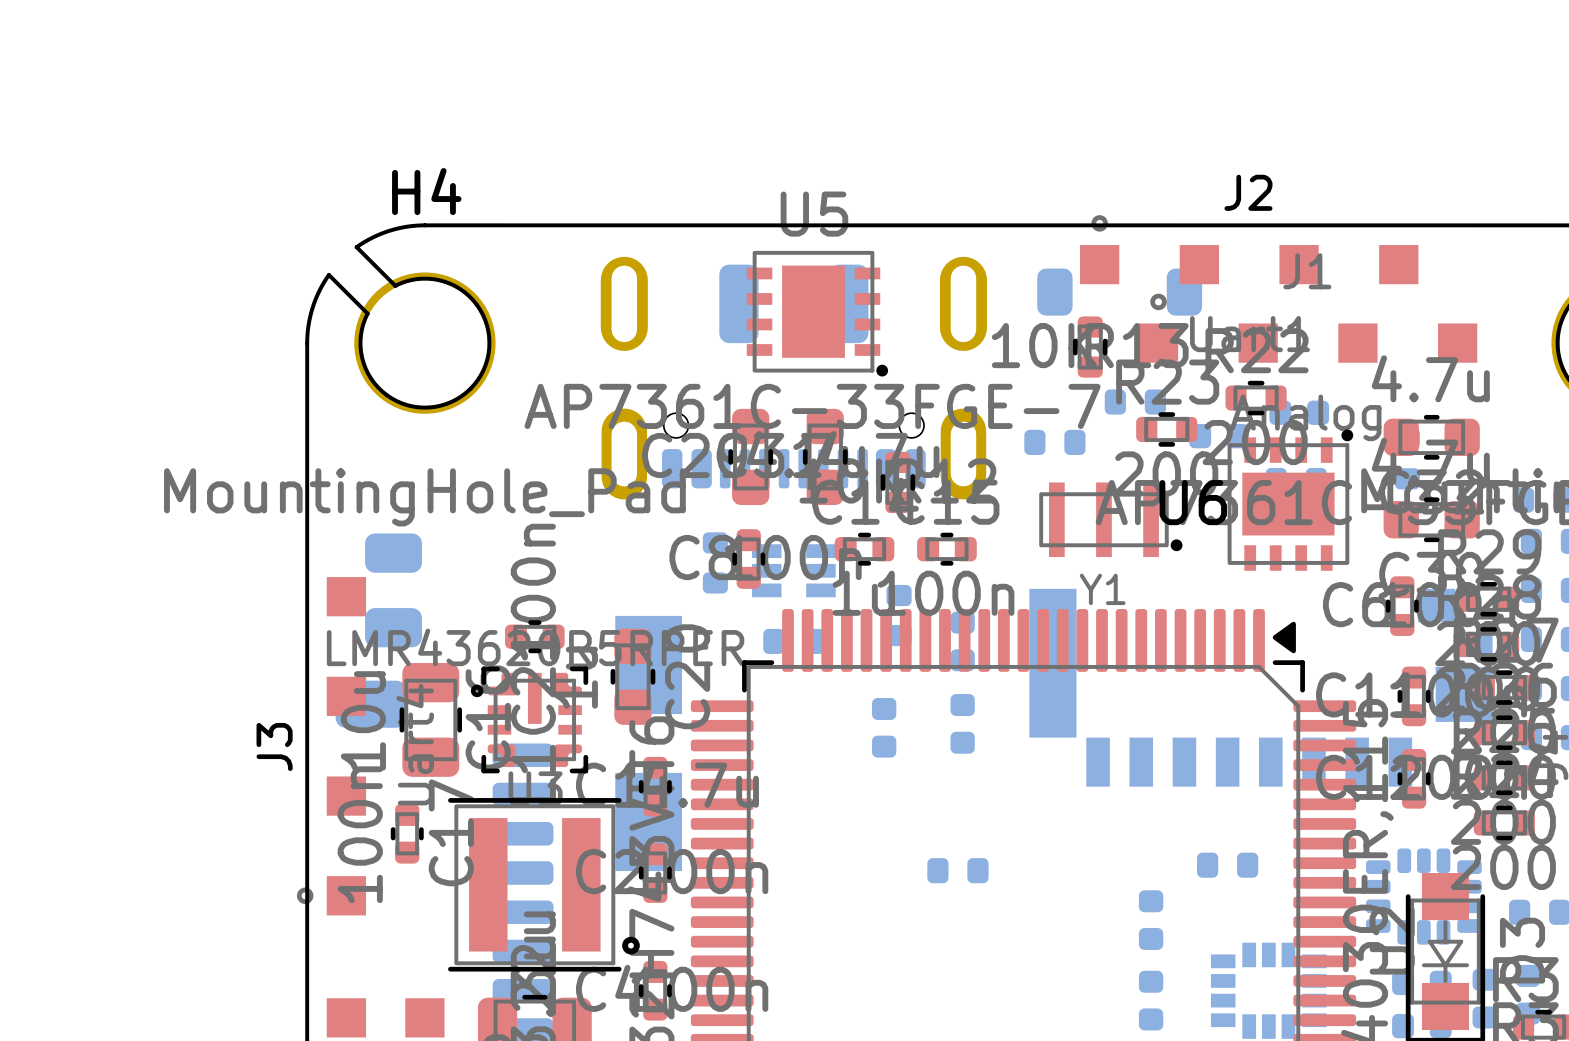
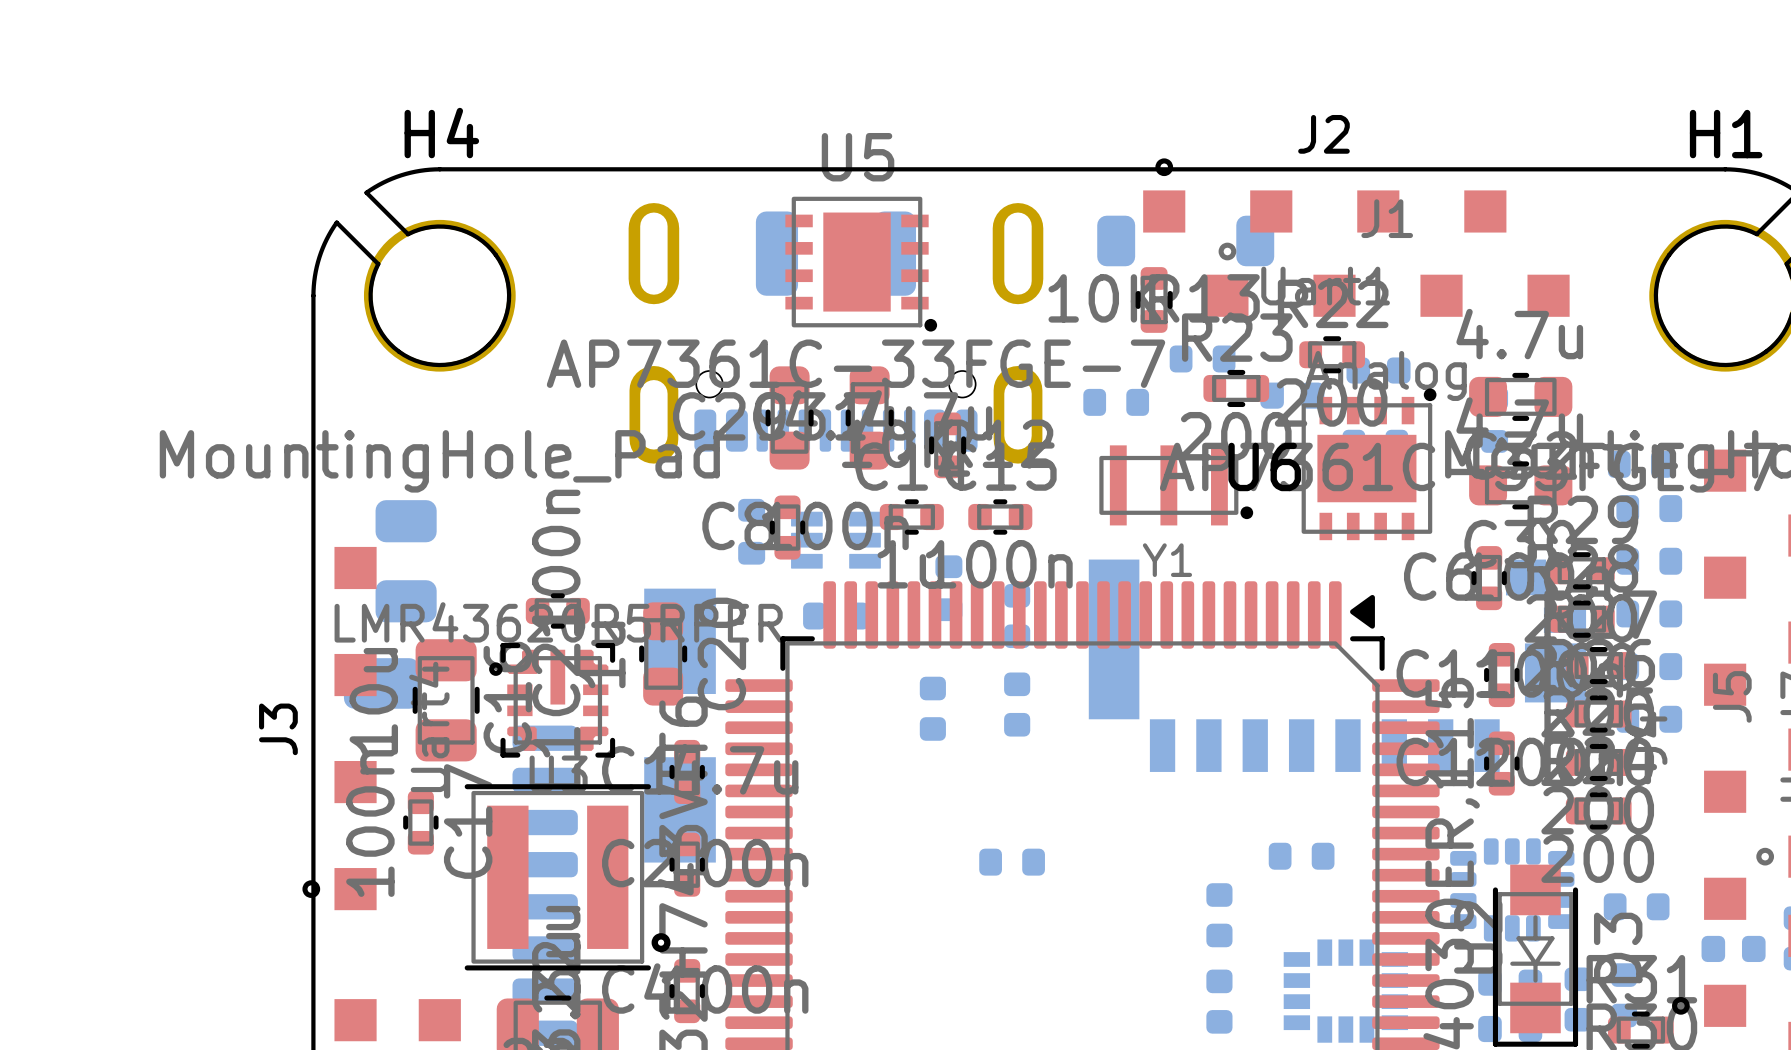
J2 footprint: [1080, 215, 1419, 285] -> [1143, 158, 1507, 233]
J3 footprint: [296, 577, 367, 916] -> [302, 546, 377, 911]

